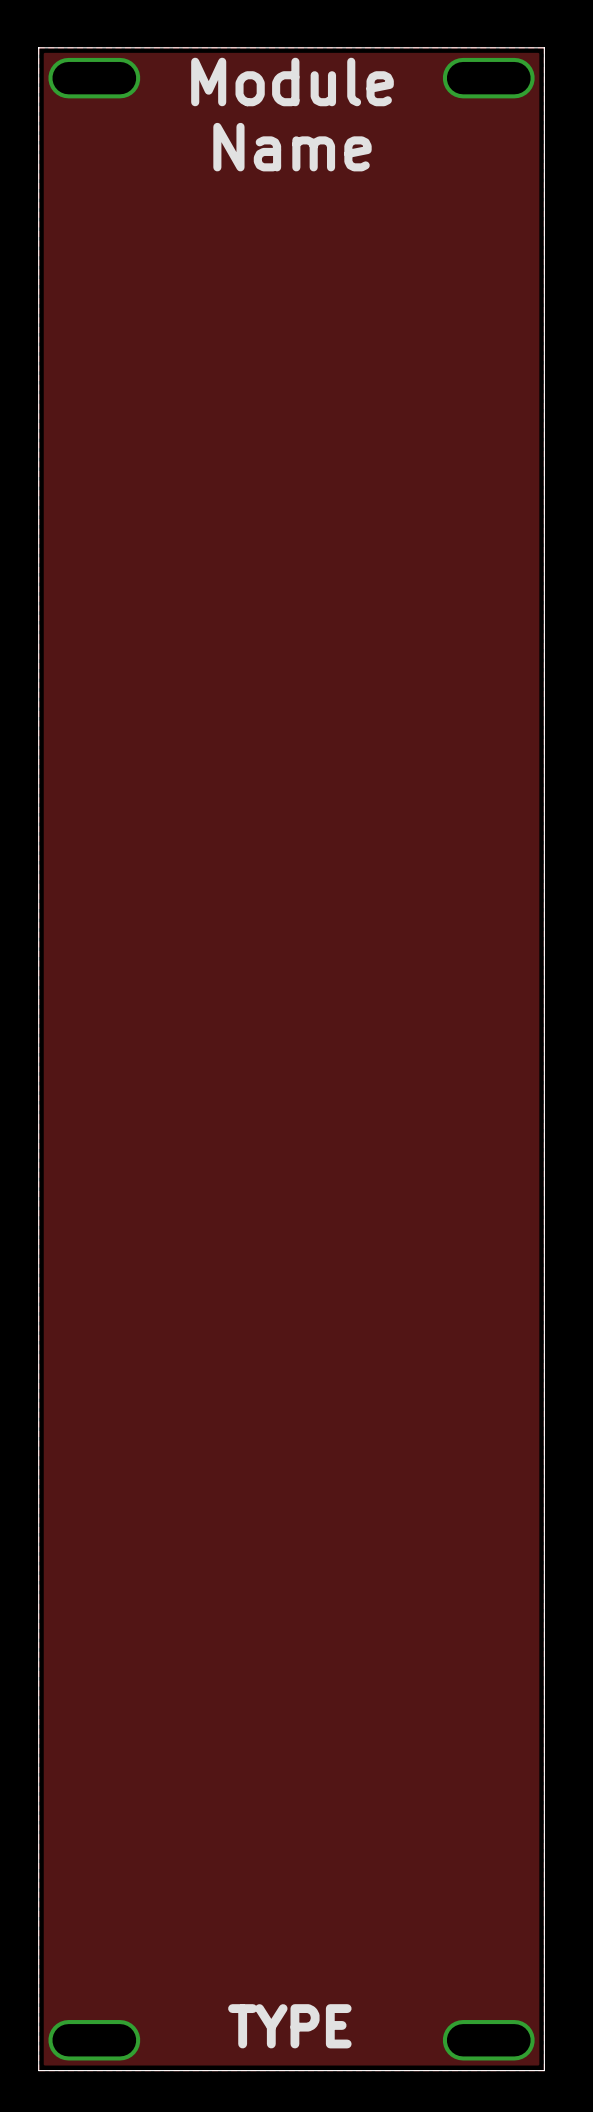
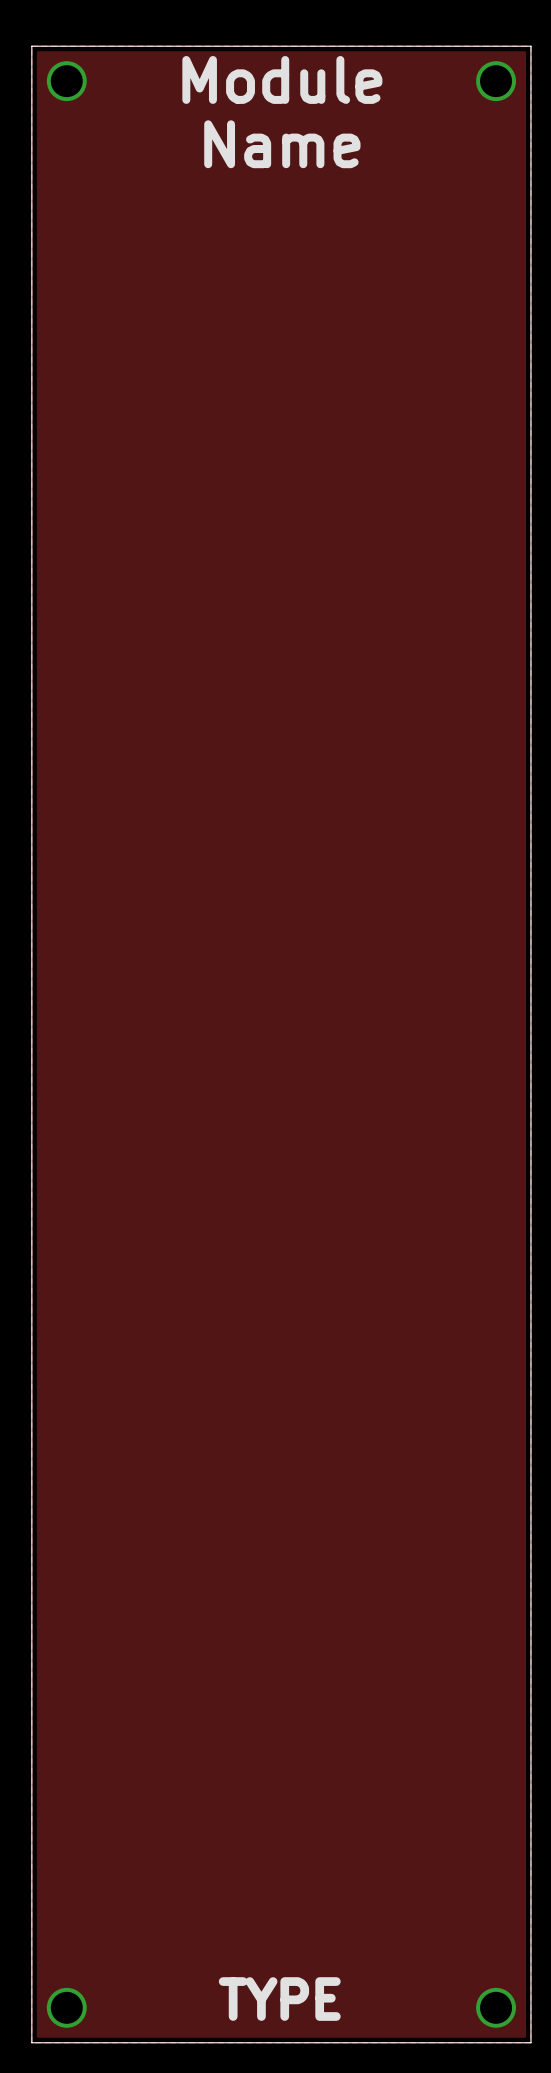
part: (94, 78) -> none
part: (488, 78) -> none
part: none -> (66, 81)
part: none -> (496, 81)
part: none -> (66, 2007)
part: none -> (496, 2007)
part: (94, 2040) -> none
part: (488, 2040) -> none

